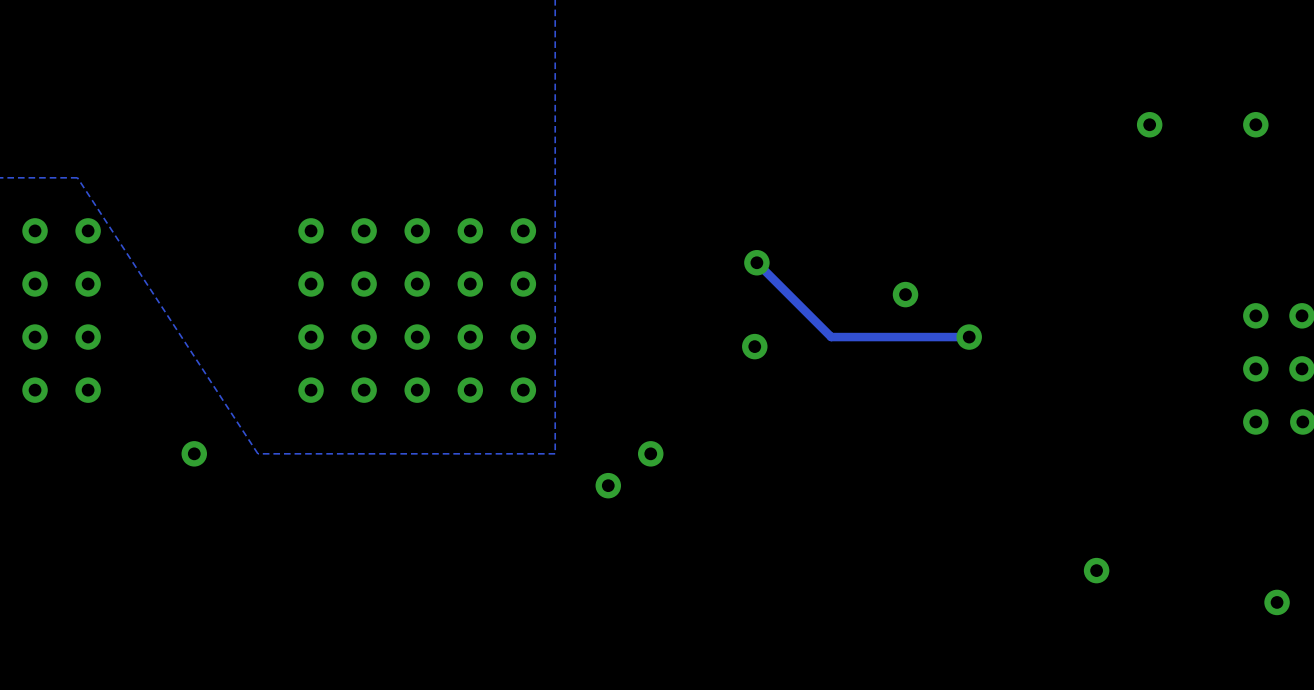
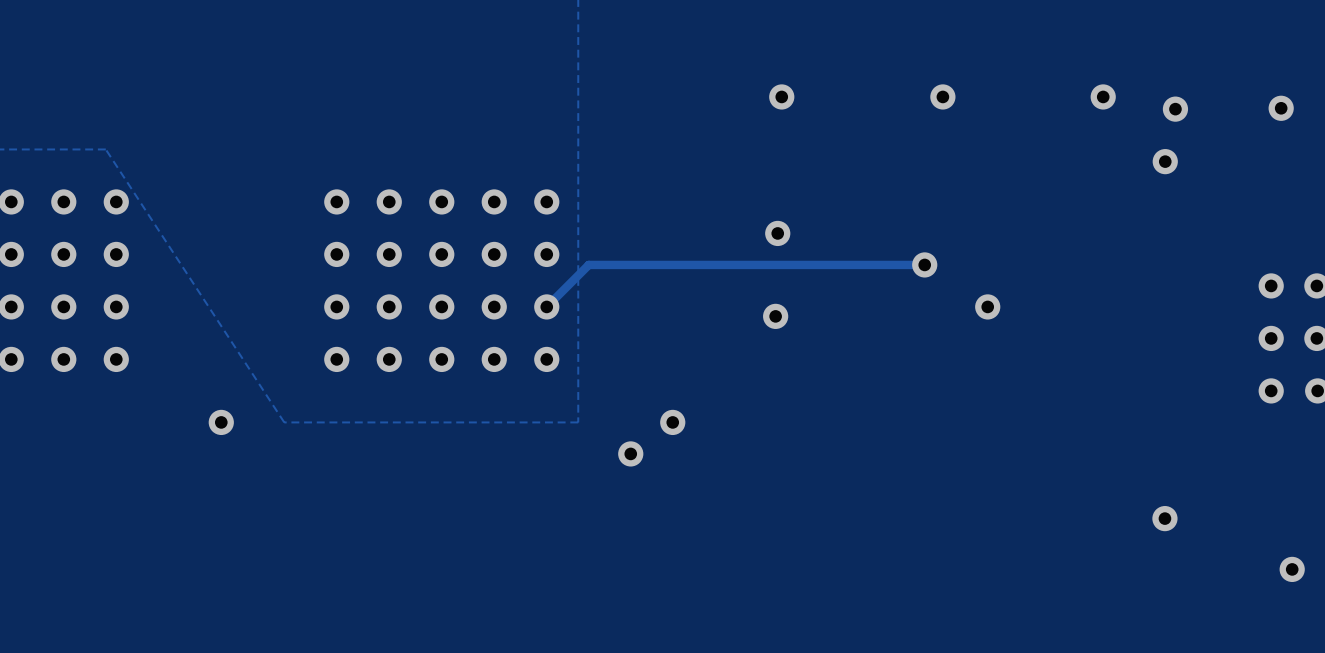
via: none -> (781, 96)
via: none -> (942, 96)
via: none -> (1103, 96)
via position: (1149, 124) -> (1175, 109)
via position: (1255, 124) -> (1281, 108)
via: none -> (1165, 161)
track: (756, 262) (831, 337) (969, 337) -> none
track: none -> (924, 264) (588, 264) (546, 306)
via position: (1096, 570) -> (1164, 518)

